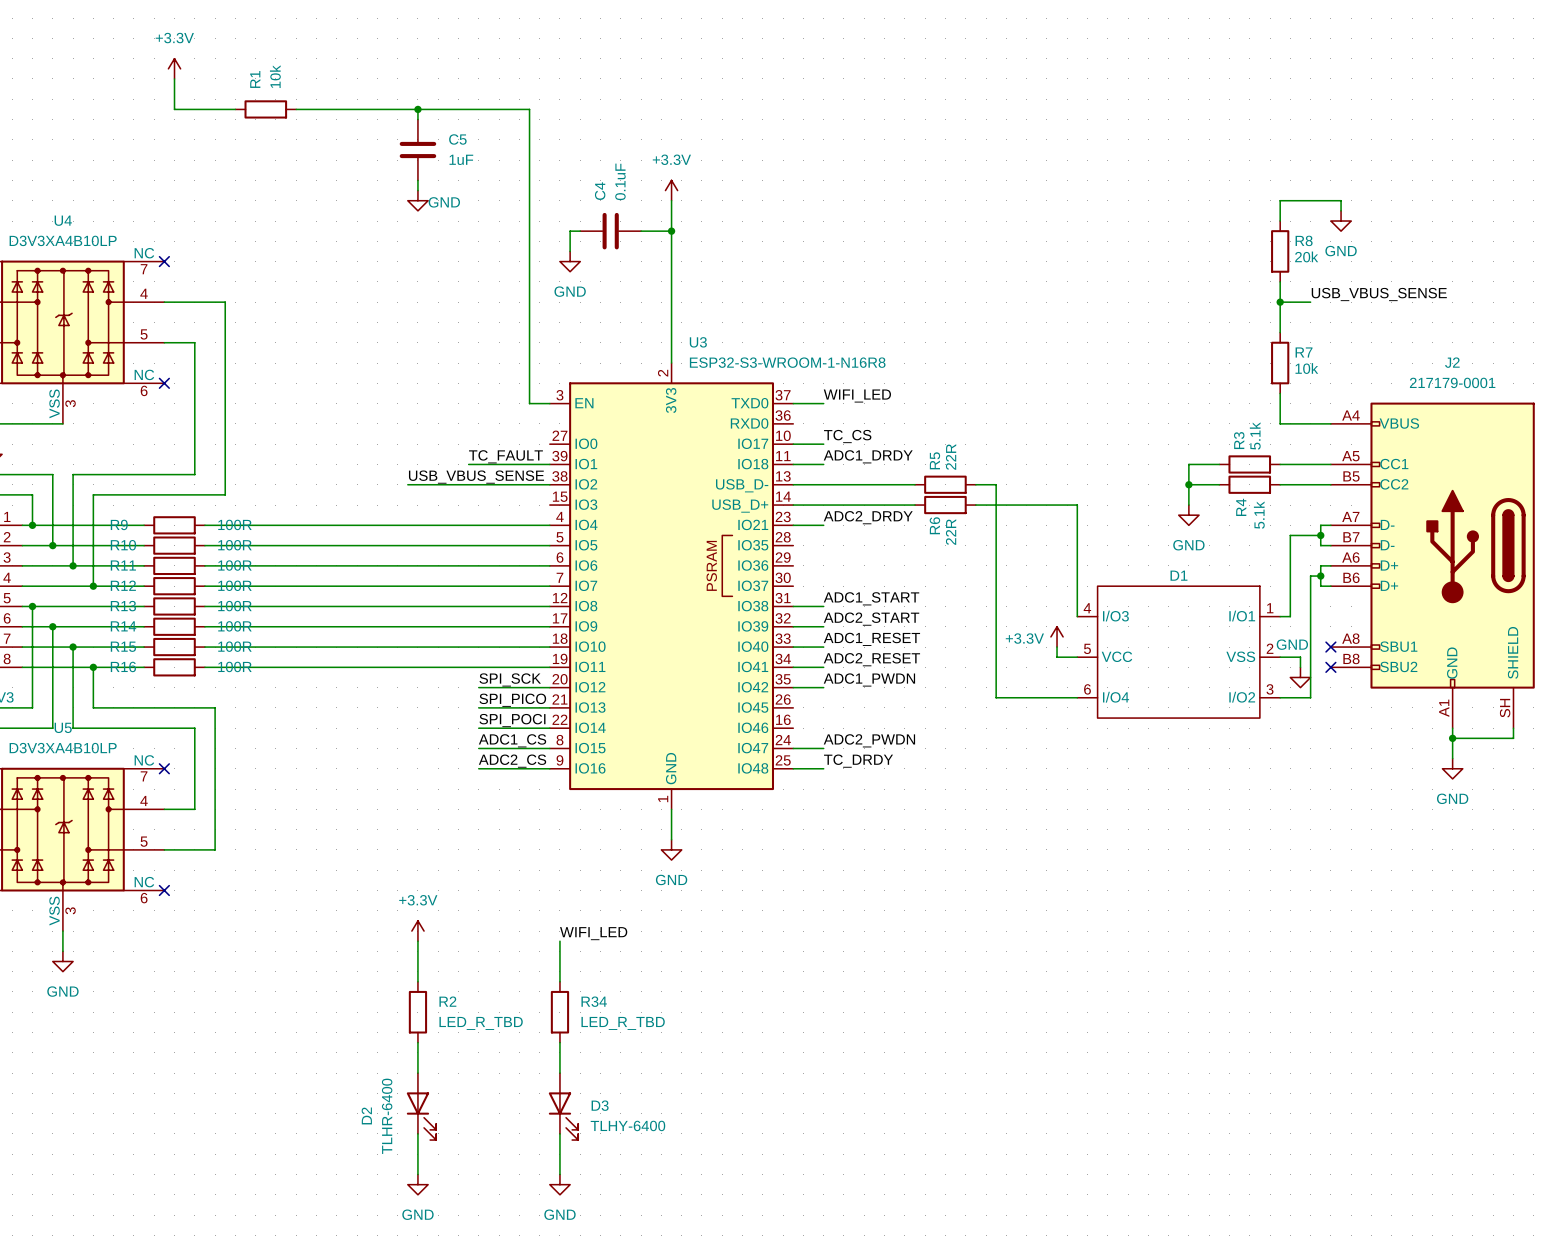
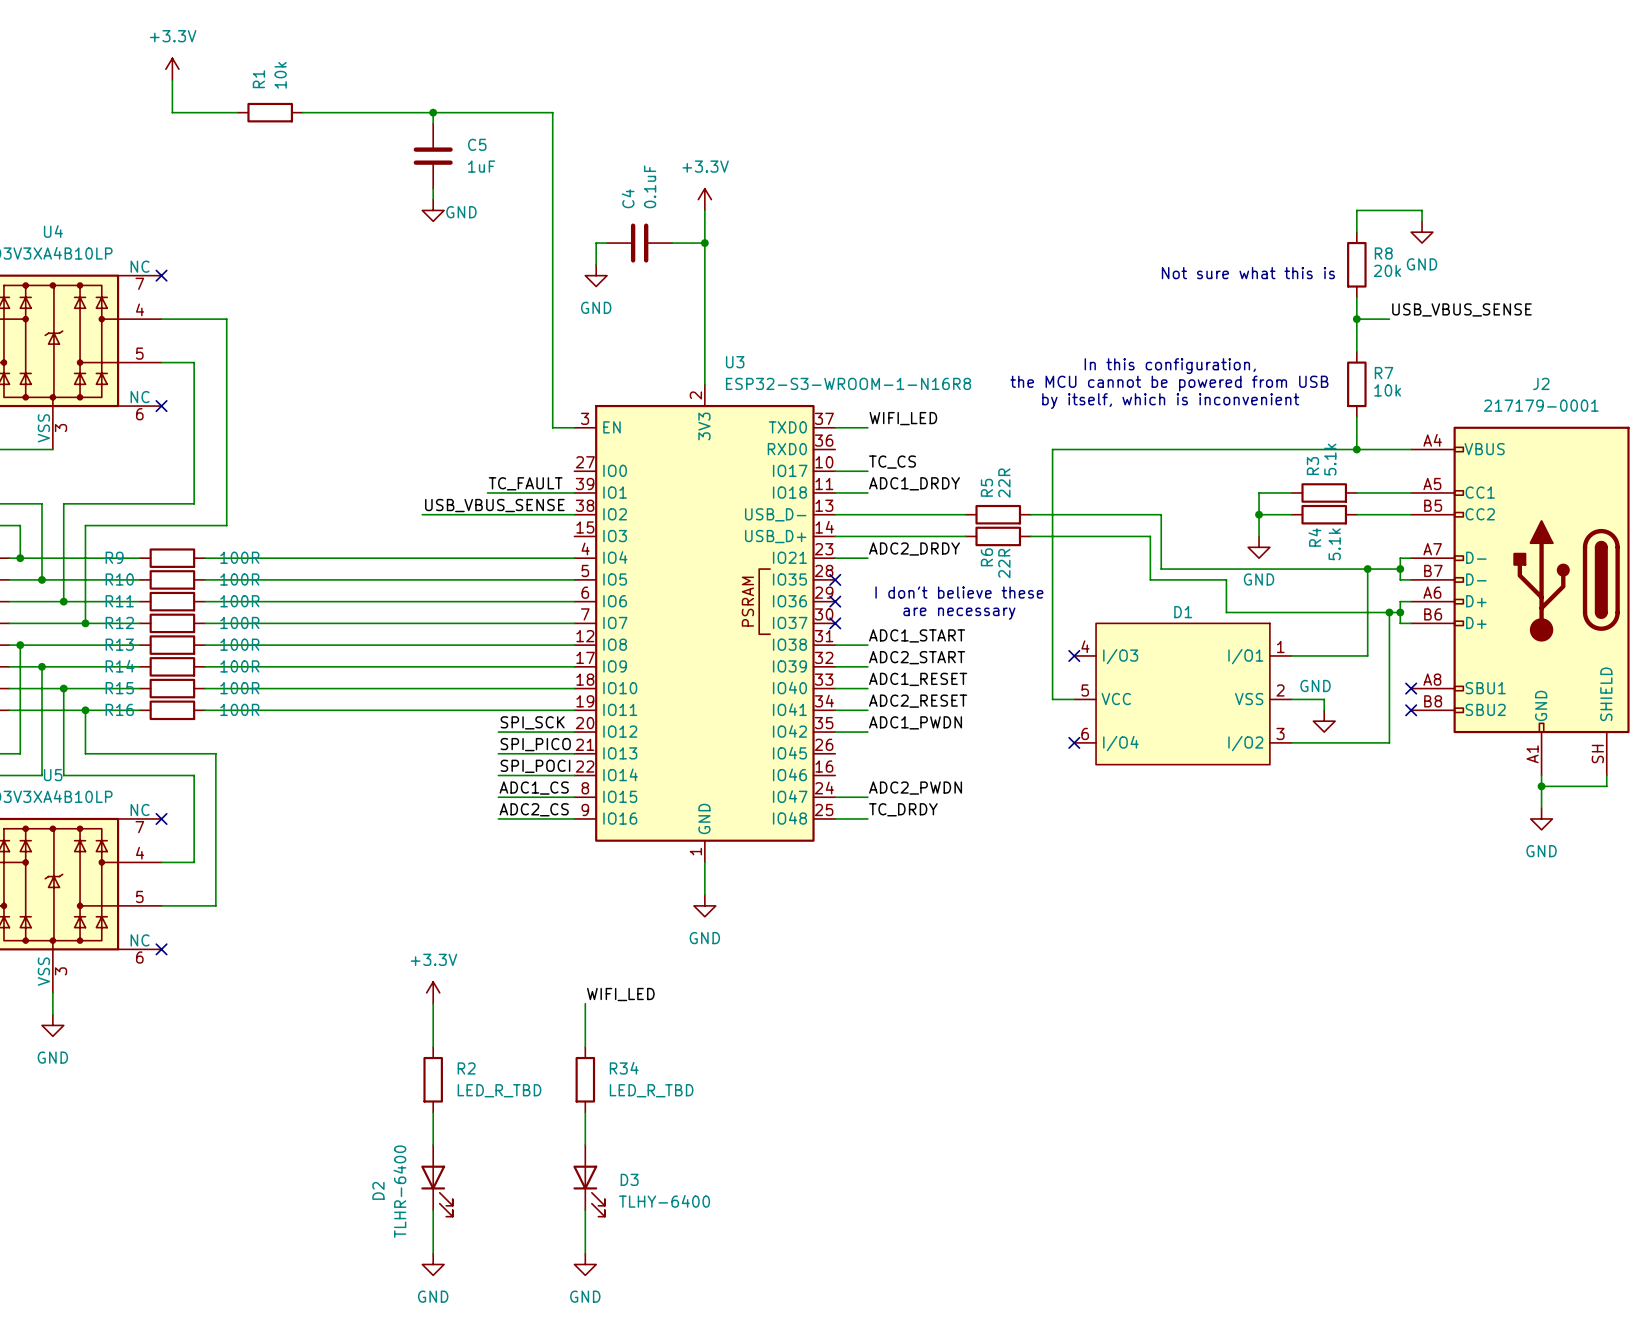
text: none -> Not sure what this is (1248, 273)
text: none -> In this configuration, (1170, 366)
text: none -> the MCU cannot be powered from USB (1169, 383)
text: none -> by itself, which is inconvenient (1170, 401)
wire: none -> (1356, 449) (1052, 449) (1052, 514) (1161, 514) (1161, 569) (1367, 569)
junction: none -> (1356, 449)
wire: (1077, 505) (1077, 616) -> (1139, 536) (1150, 536) (1150, 579) (1226, 579) (1226, 612) (1389, 612)
junction: none -> (1367, 569)
no-connect mark: none -> (835, 579)
text: none -> I don't believe these (959, 592)
no-connect mark: none -> (835, 601)
text: none -> are necessary (959, 613)
junction: none -> (1389, 612)
no-connect mark: none -> (835, 623)
D1 symbol: [1077, 586, 1281, 719] -> [1074, 623, 1292, 765]
no-connect mark: none -> (1074, 655)
wire: none -> (1291, 655) (1356, 655)
power symbol: +3.3V (1057, 636) -> none
wire: (996, 657) (996, 697) (1077, 697) -> (1052, 699) (1074, 699)
wire: none -> (1291, 699) (1324, 699) (1324, 710)
wire: (1280, 657) (1300, 657) (1300, 667) -> none
power symbol position: GND (1300, 677) -> GND (1324, 721)
no-connect mark: none -> (1074, 742)
wire: none -> (1291, 742) (1356, 742)

